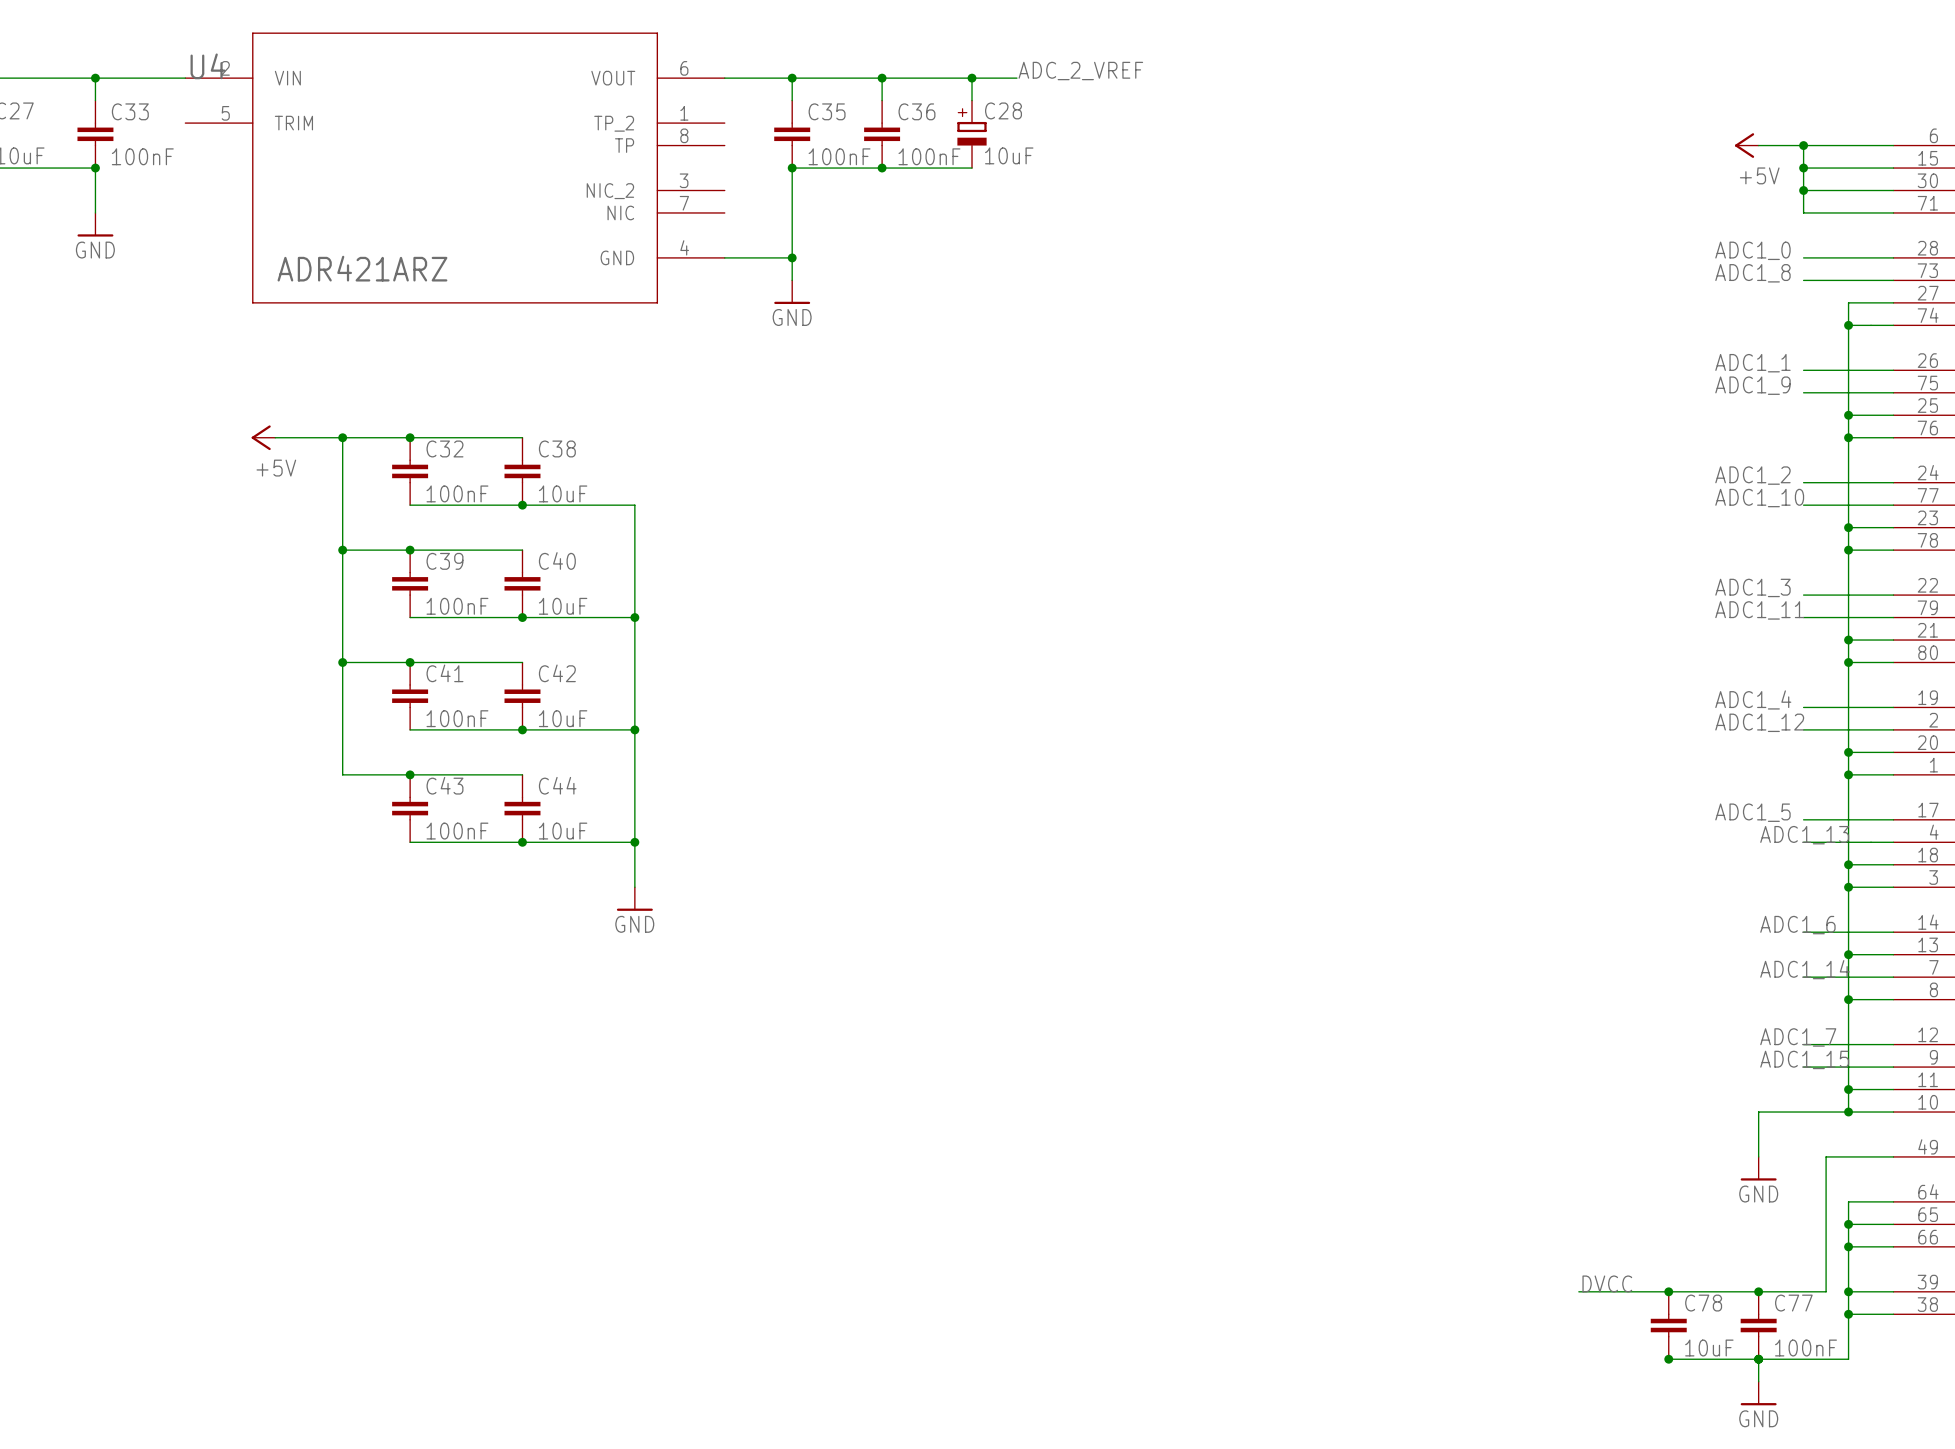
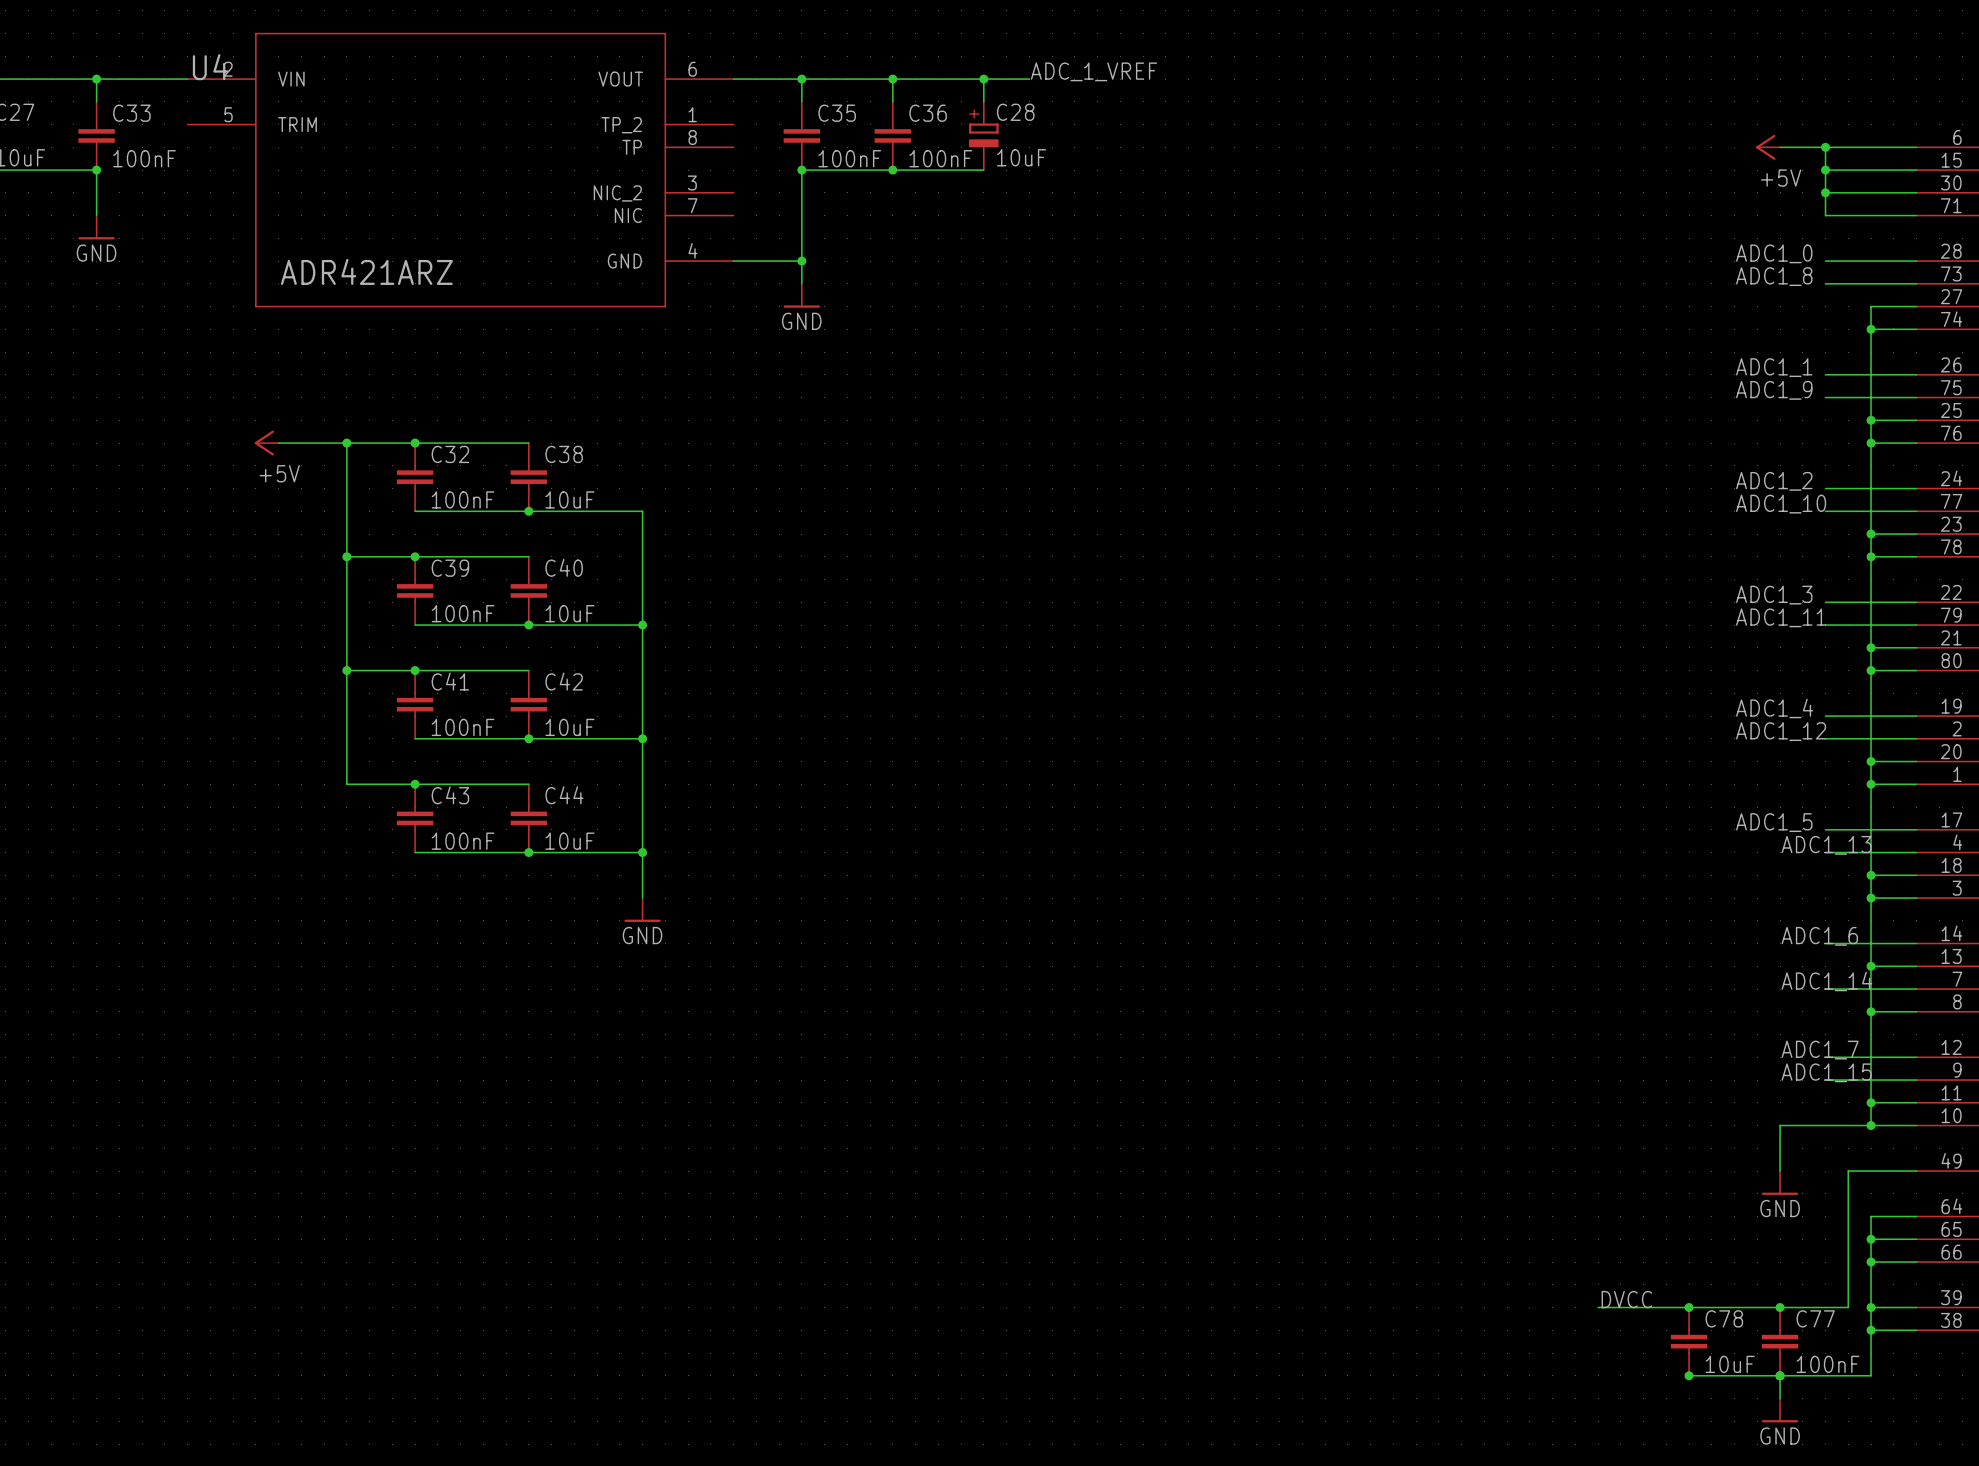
label: ADC_2_VREF (1080, 71) -> ADC_1_VREF (1093, 71)

